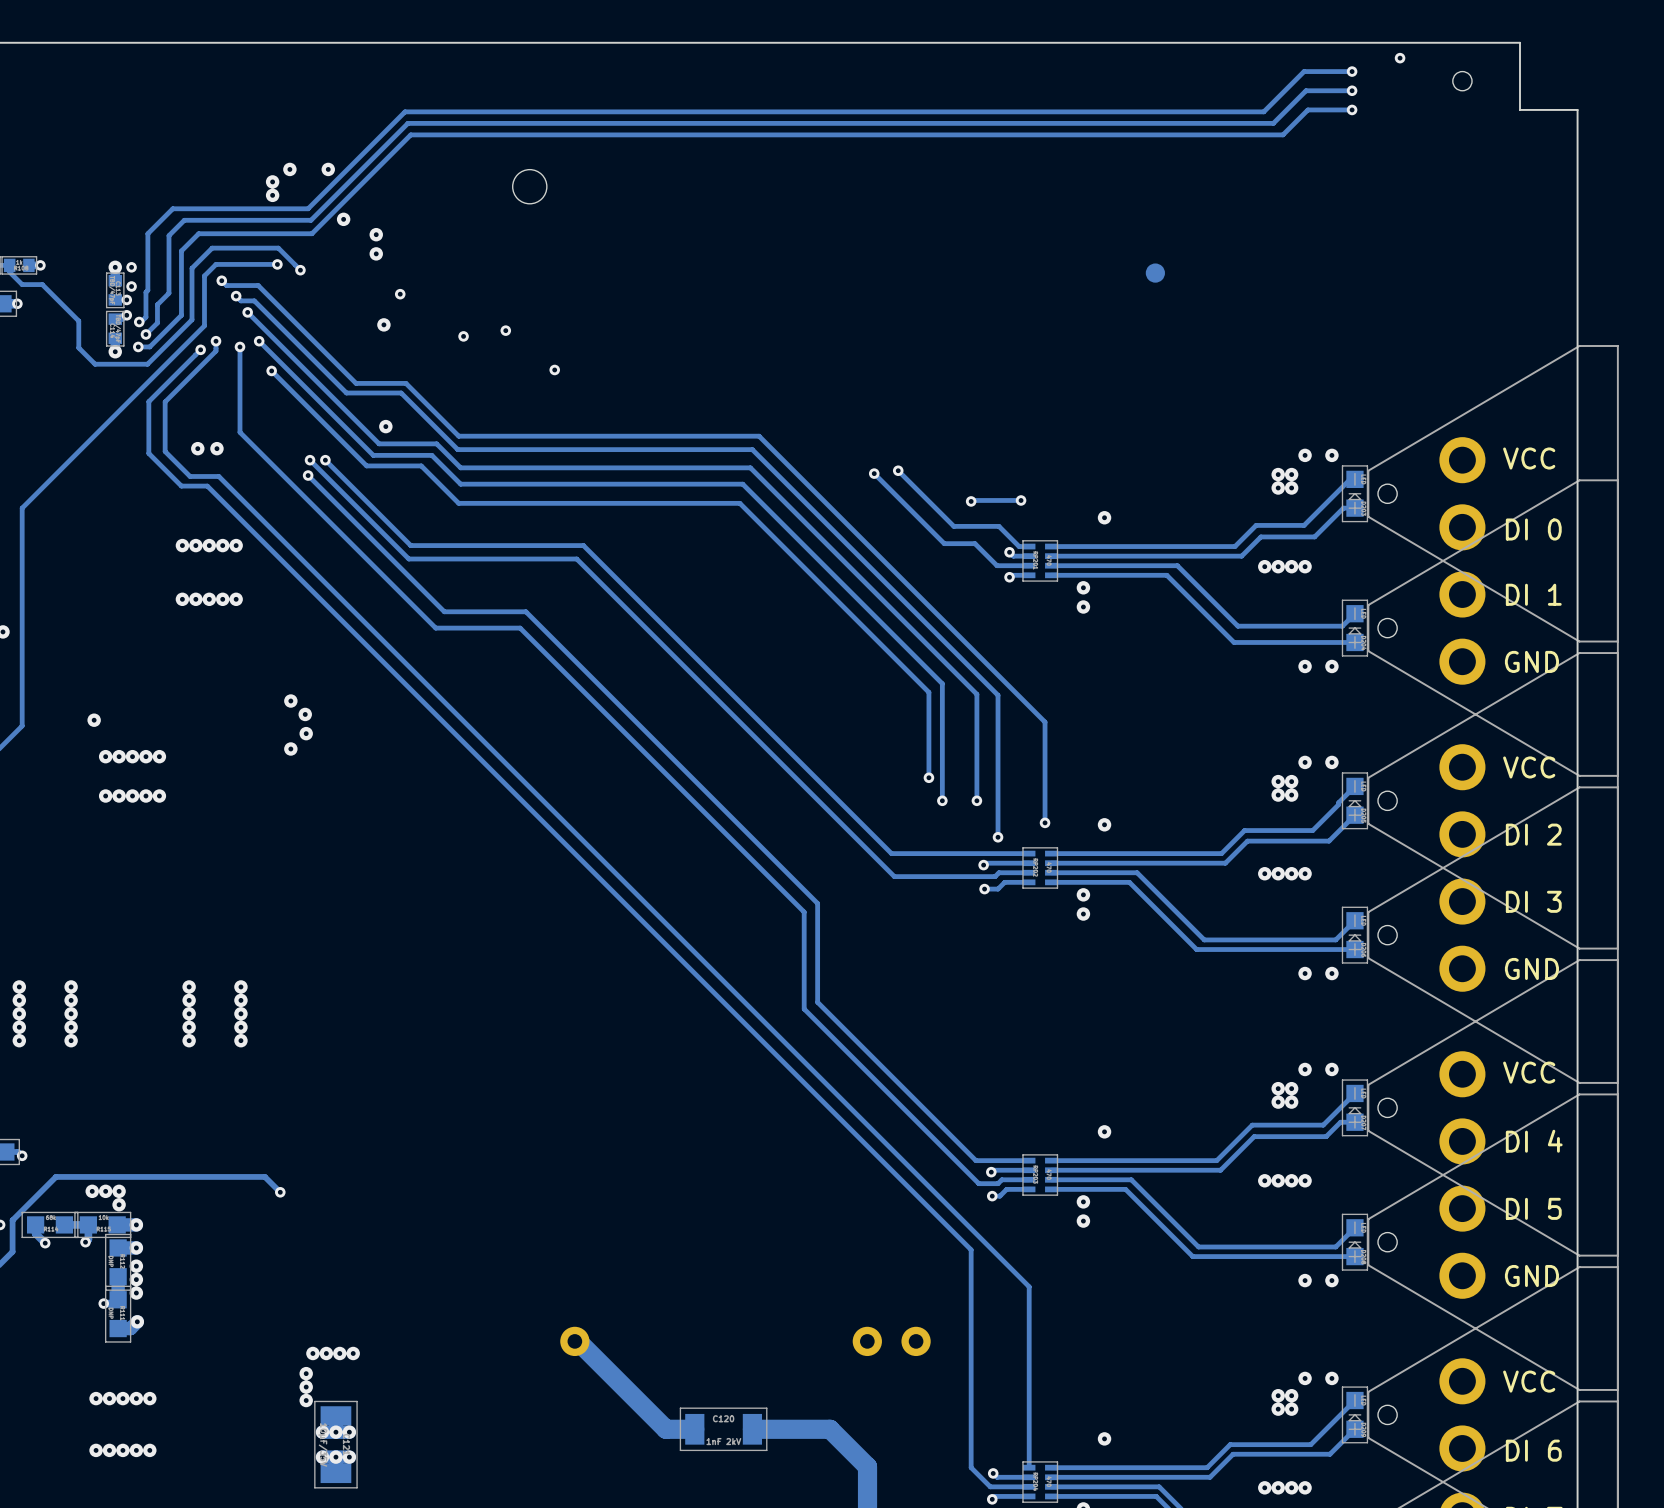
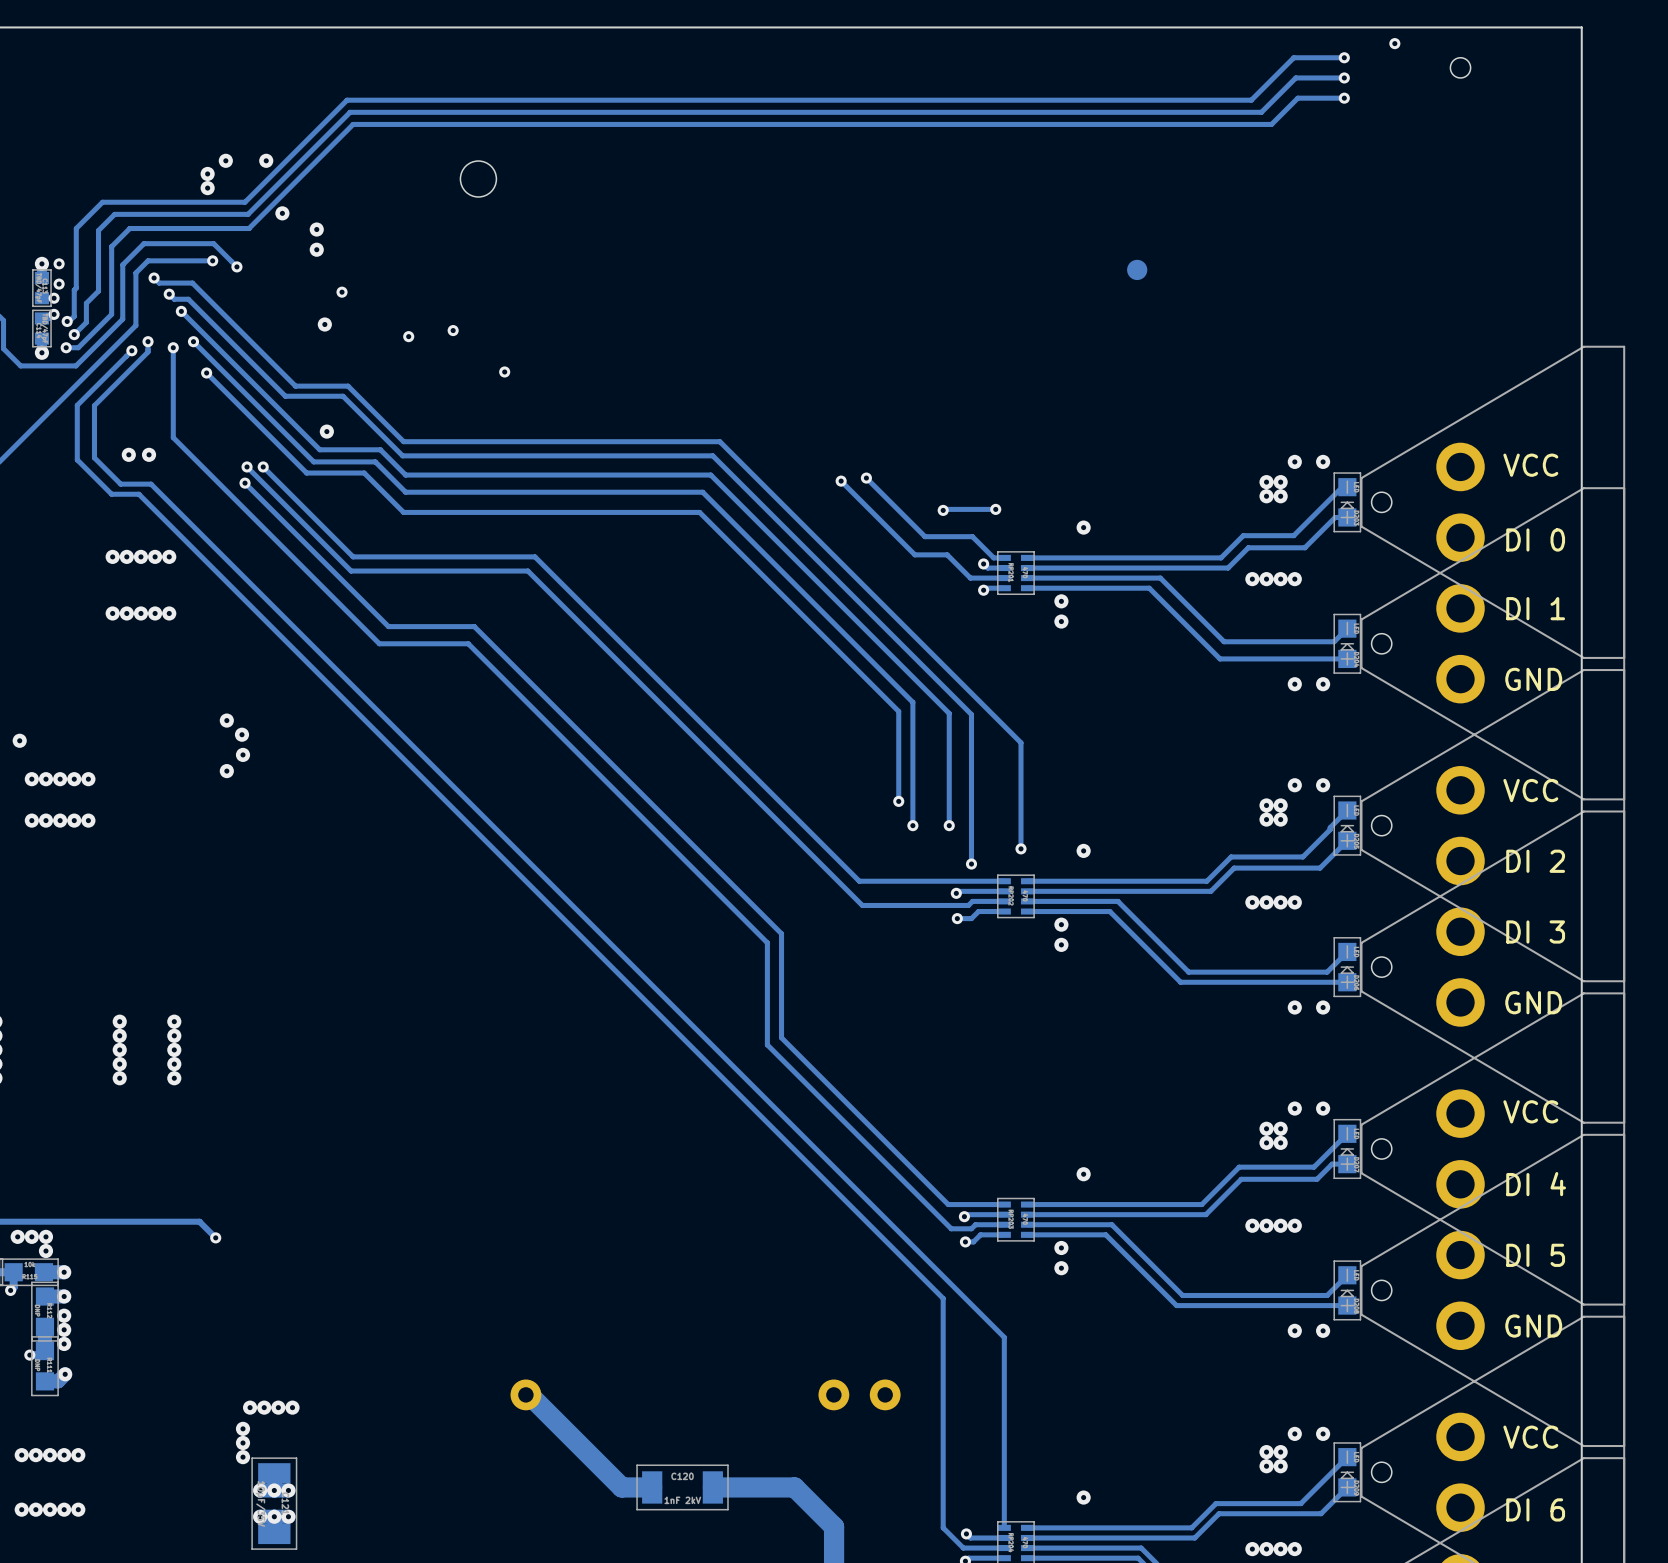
board edge: (1520, 42) (1520, 109) (1577, 109) -> (1521, 27) (1581, 27) (1581, 98)

